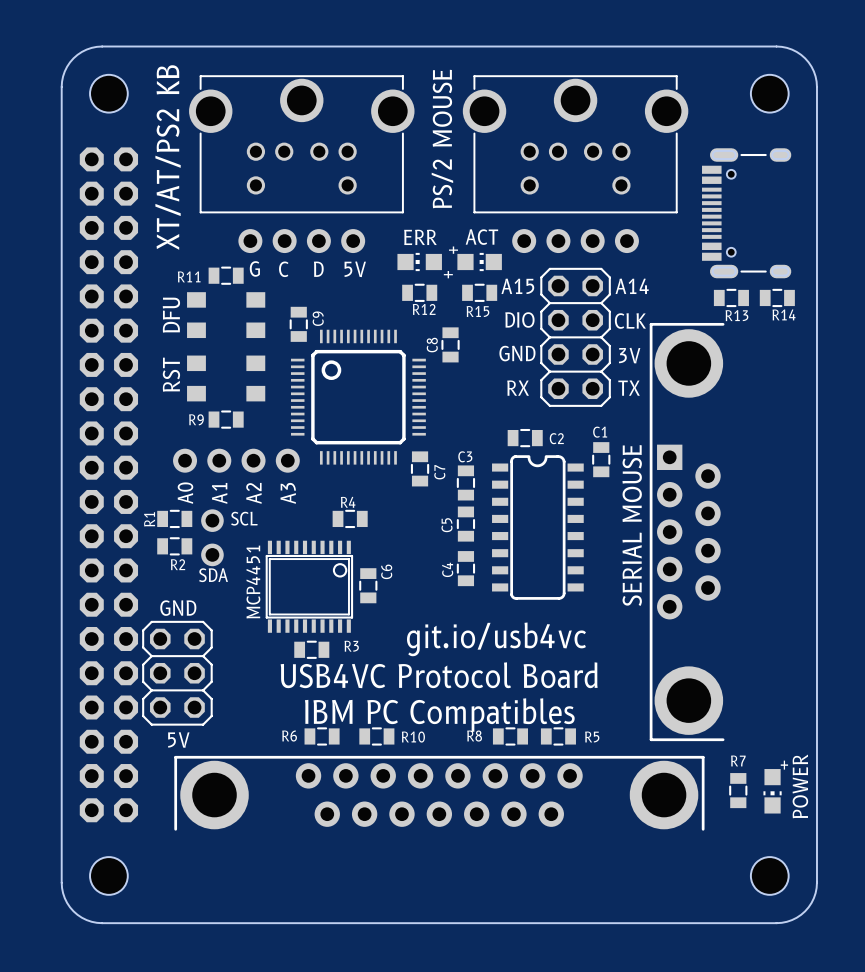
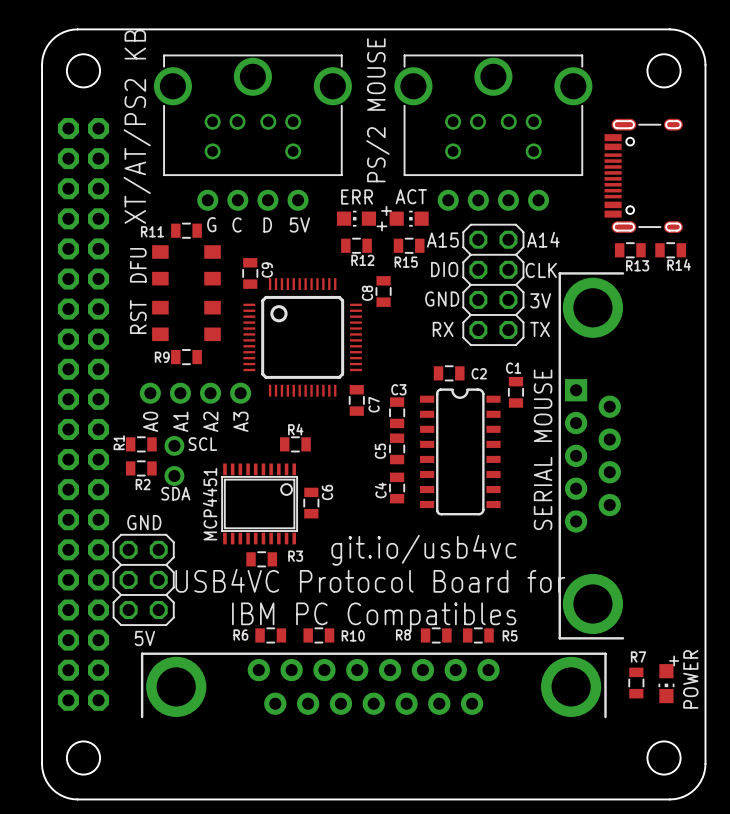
text: USB4VC Protocol Board (439, 675) -> USB4VC Protocol Board for (370, 580)

